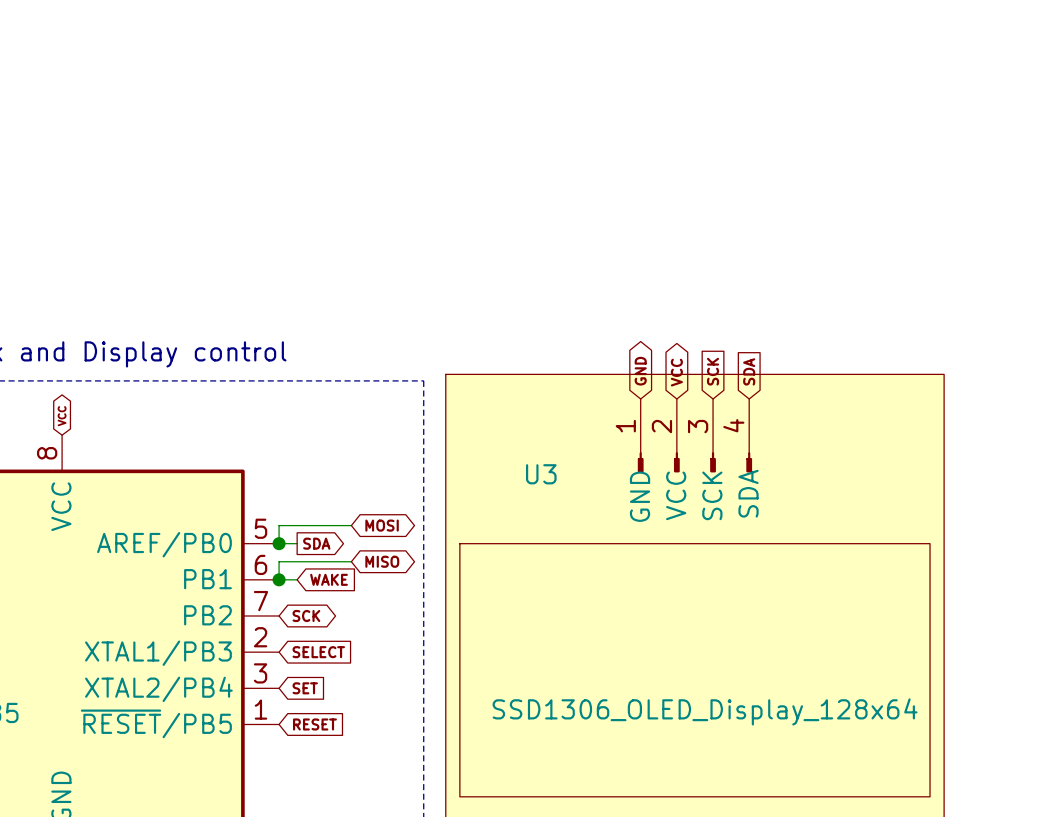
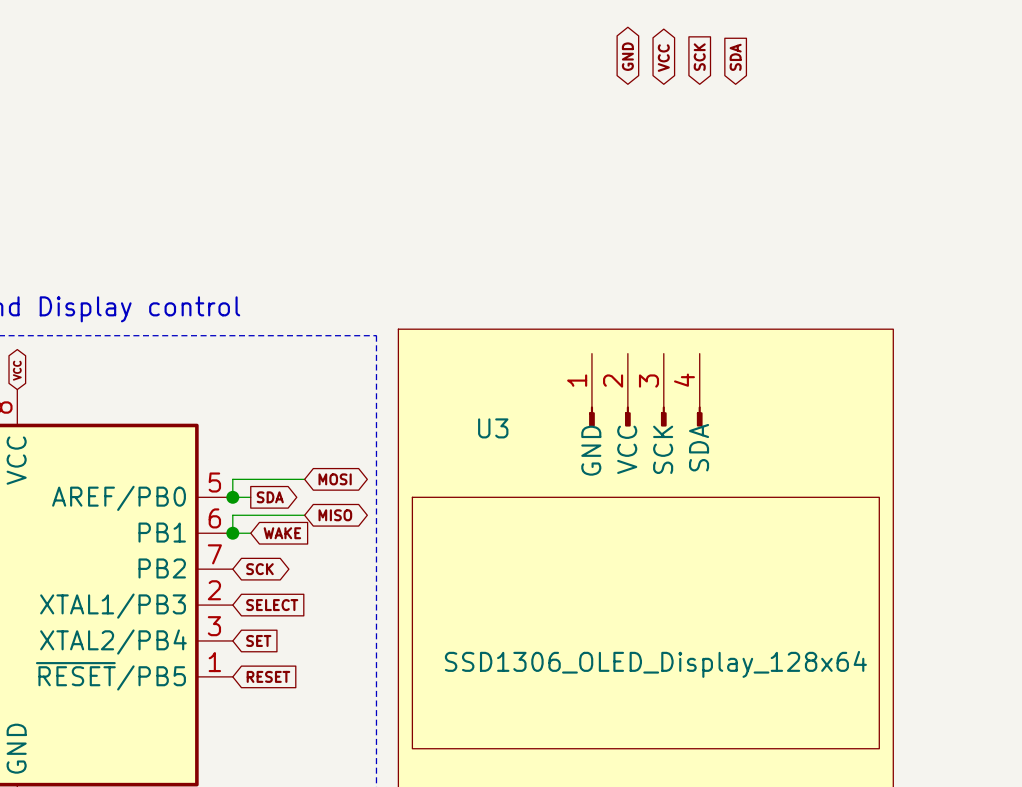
global label position: GND (640, 371) -> GND (627, 56)
global label position: SCK (713, 371) -> SCK (699, 57)
global label position: SDA (749, 371) -> SDA (735, 57)
global label position: VCC (676, 372) -> VCC (663, 58)

